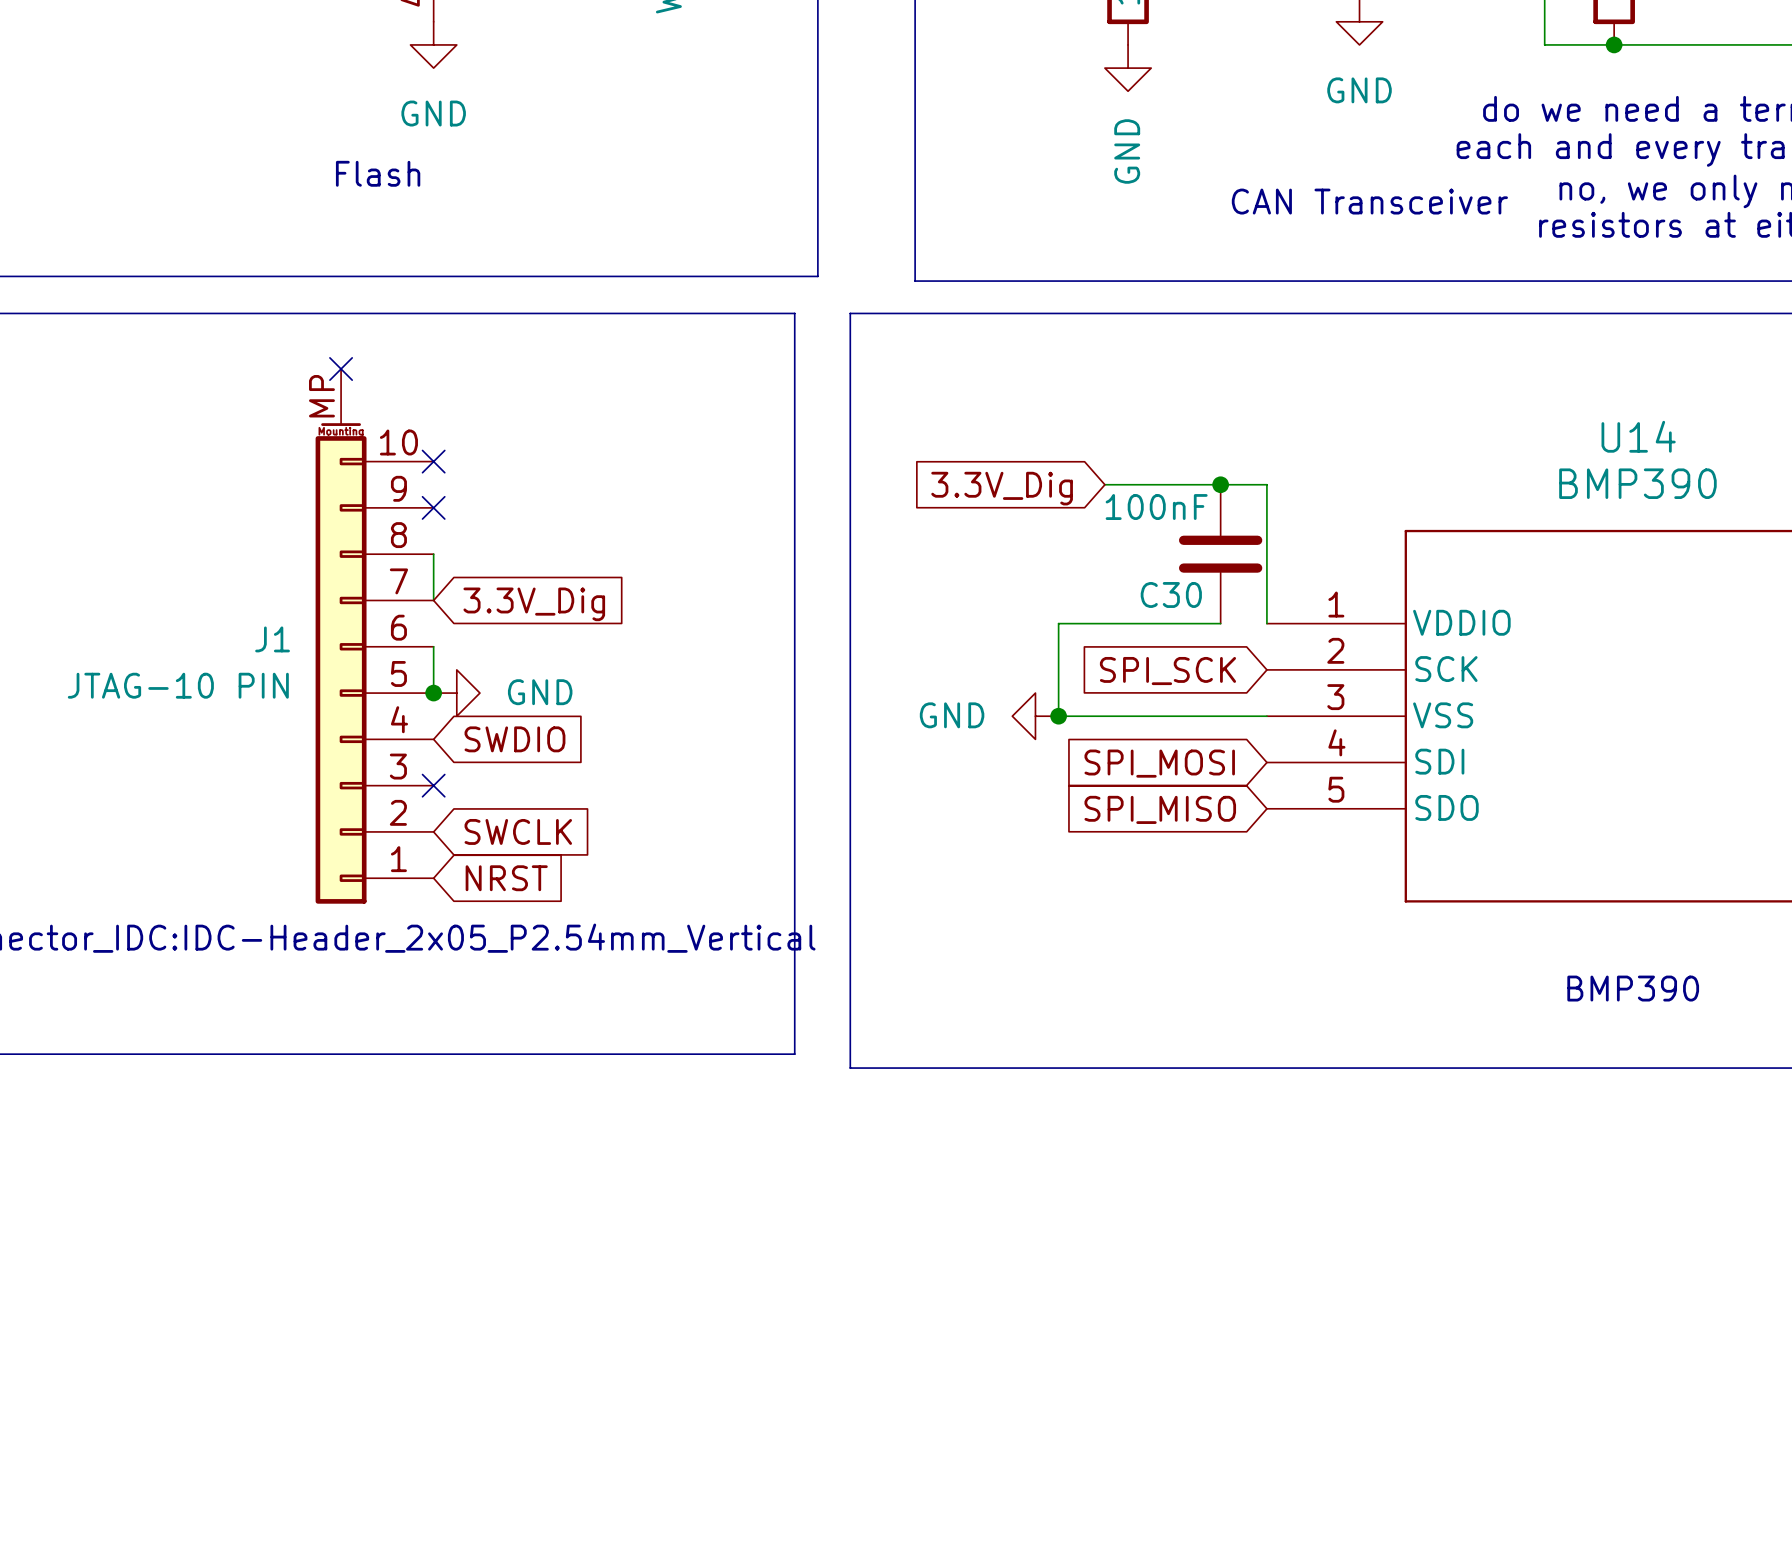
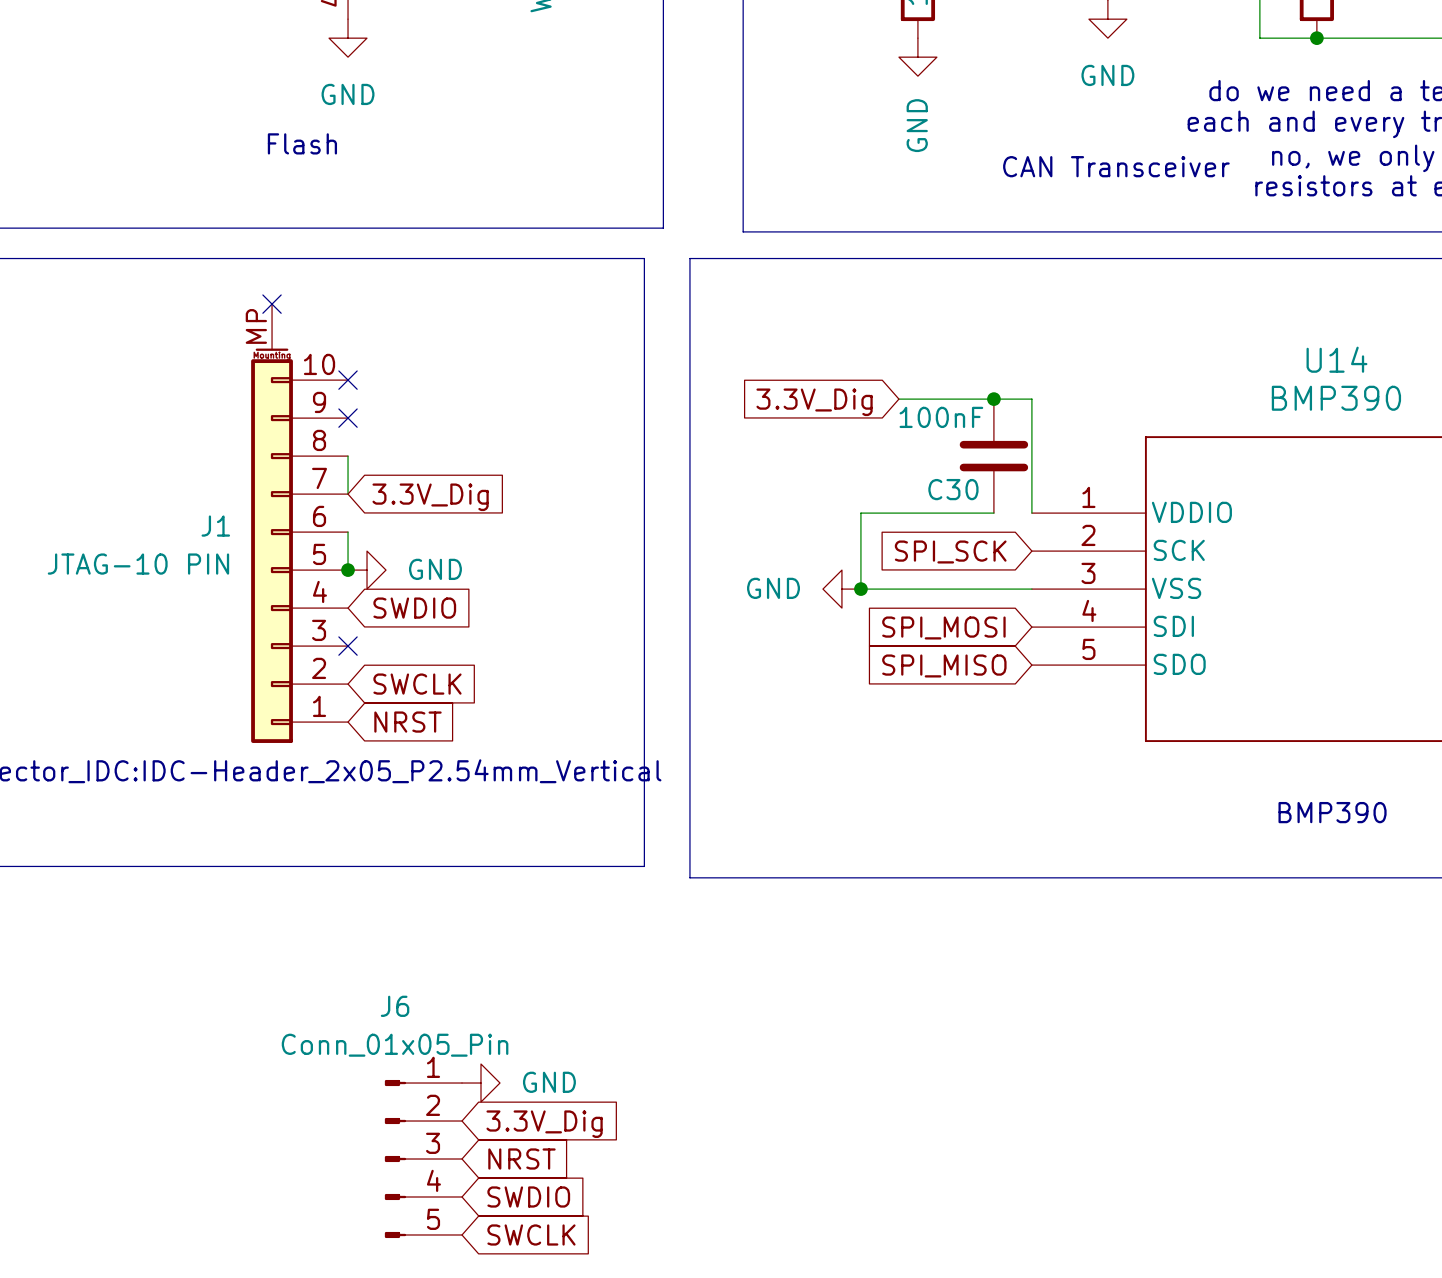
power symbol: none -> GND (481, 1083)
global label: none -> 3.3V_Dig (544, 1124)
J6: none -> Conn_01x05_Pin (423, 1159)
global label: none -> NRST (521, 1159)
global label: none -> SWDIO (528, 1197)
global label: none -> SWCLK (531, 1234)

